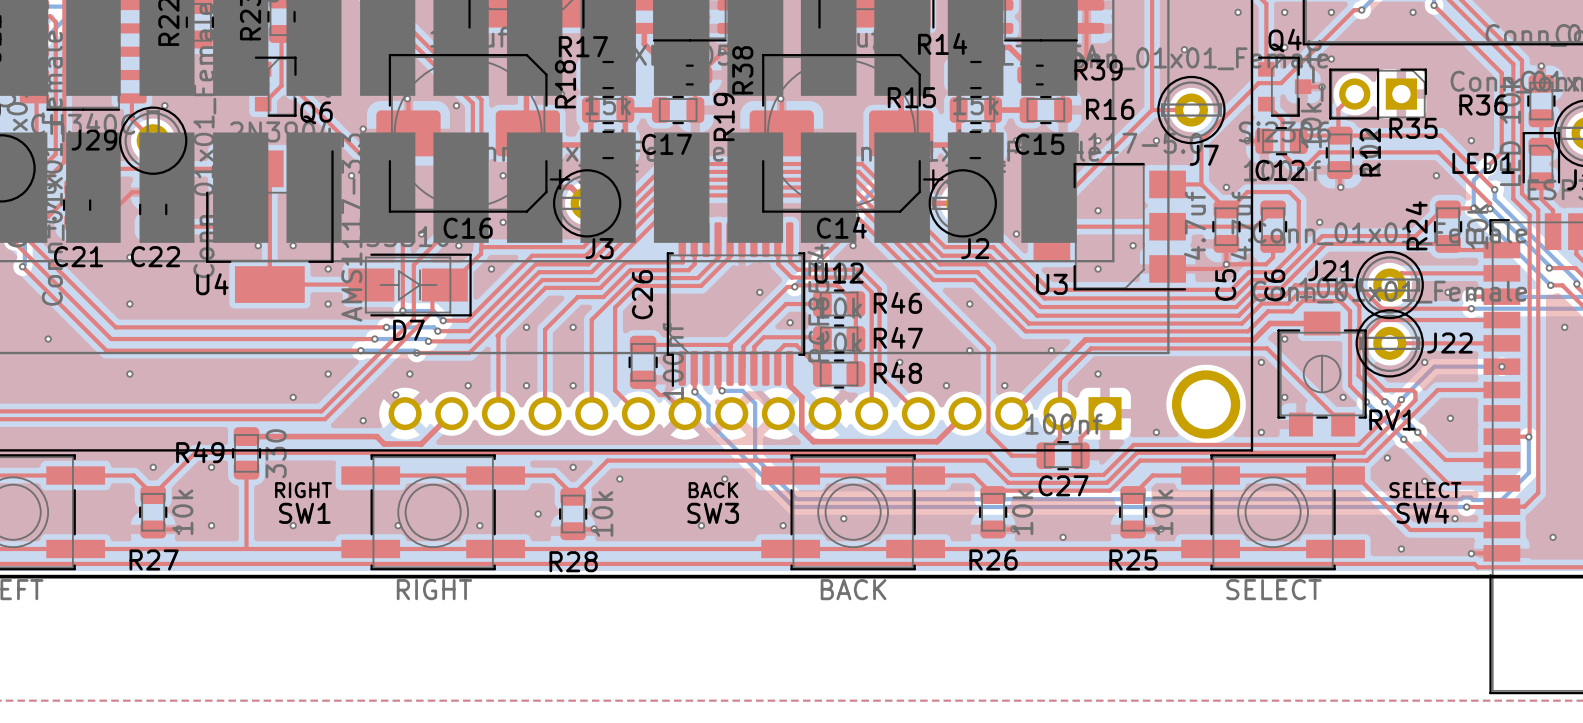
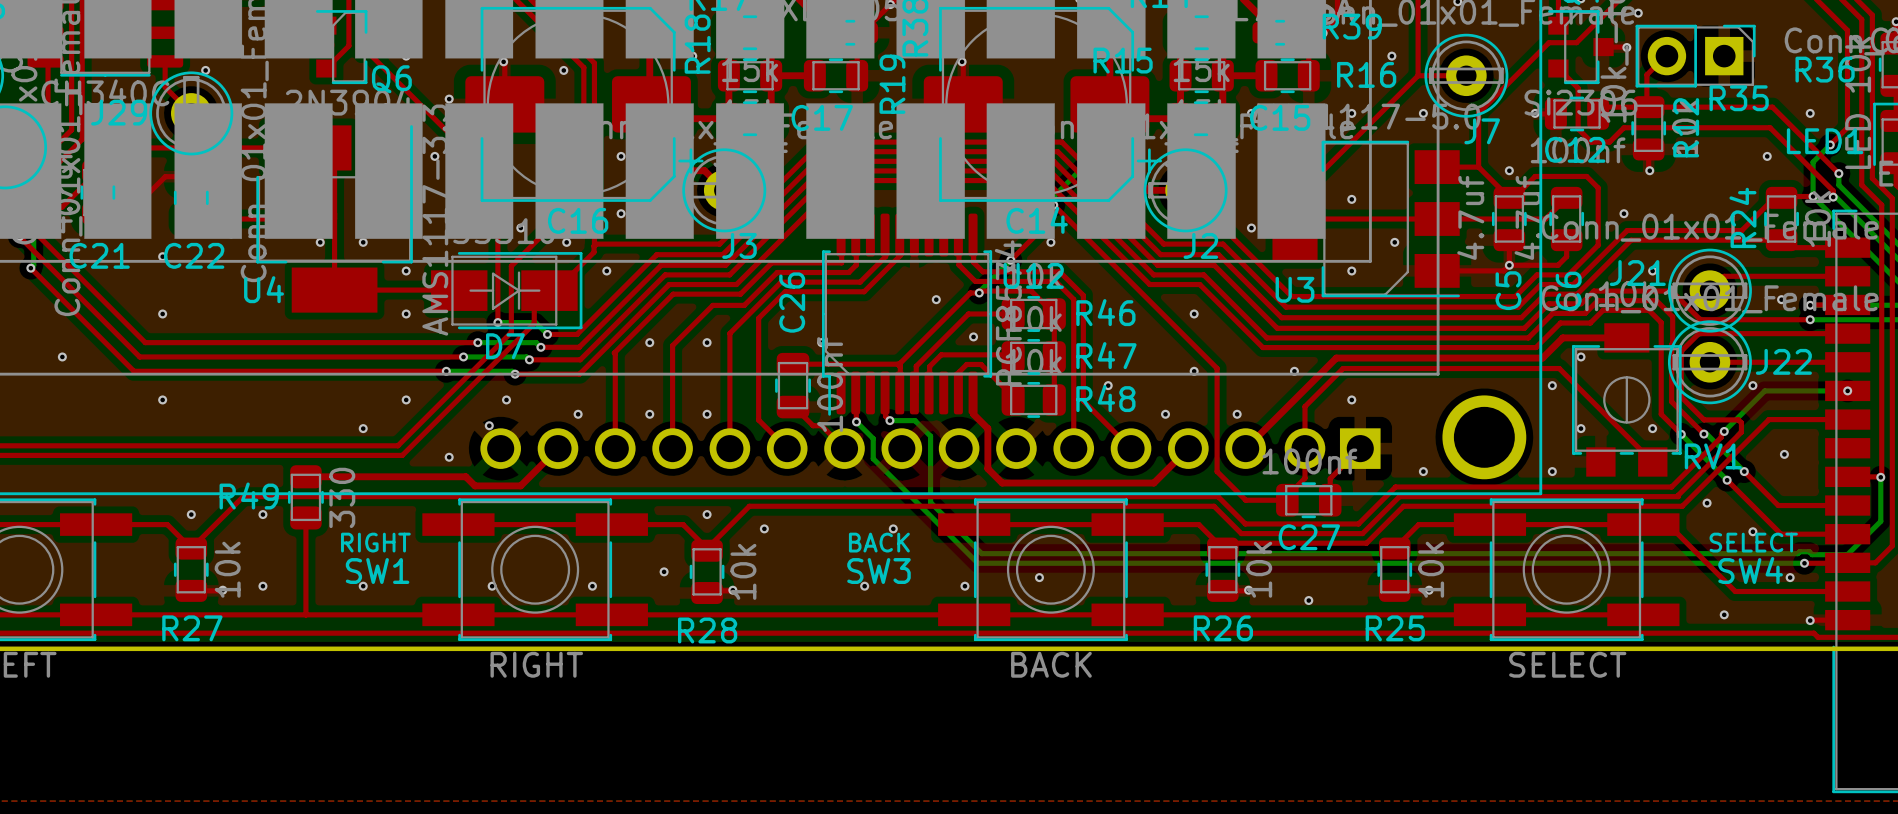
via: none -> (1391, 56)

